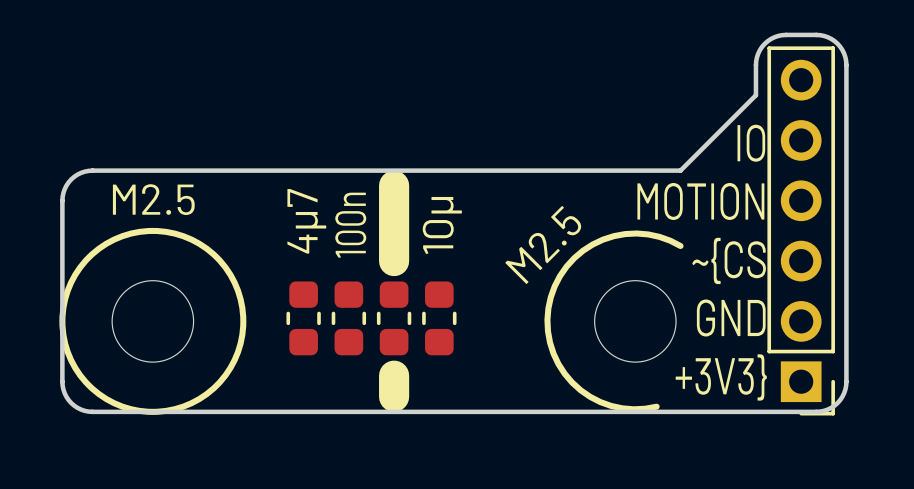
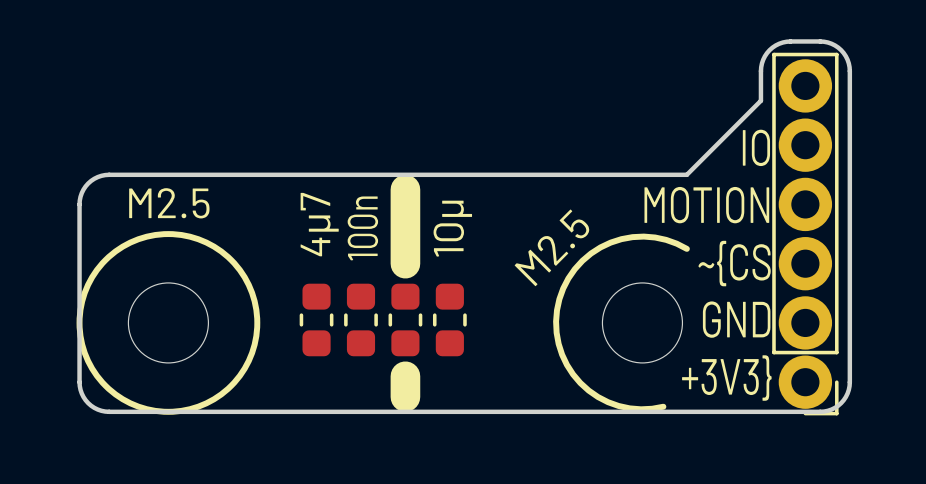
part footprint: [767, 46, 835, 416] -> [772, 52, 839, 416]

